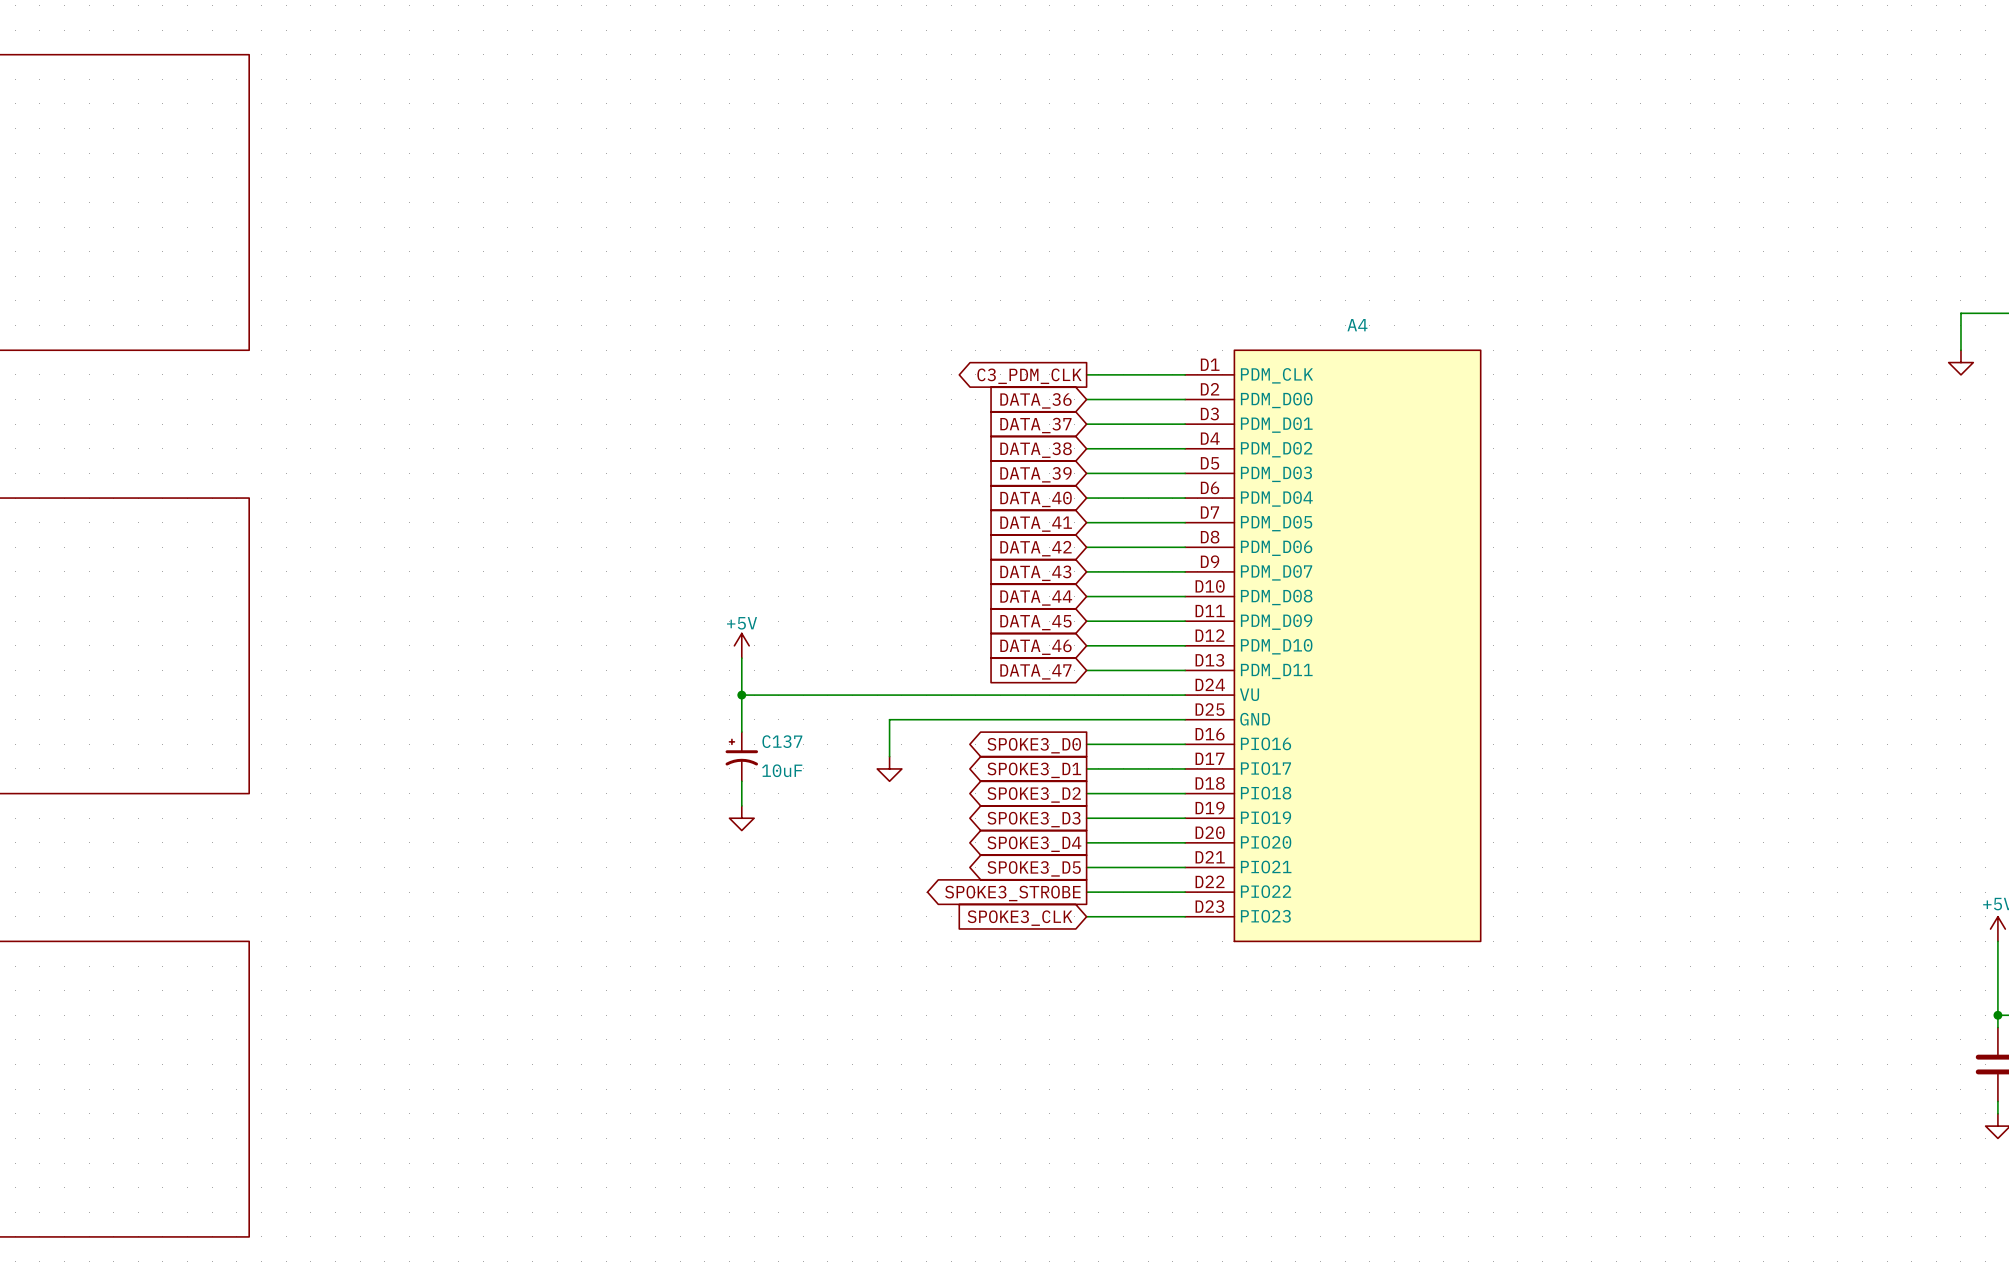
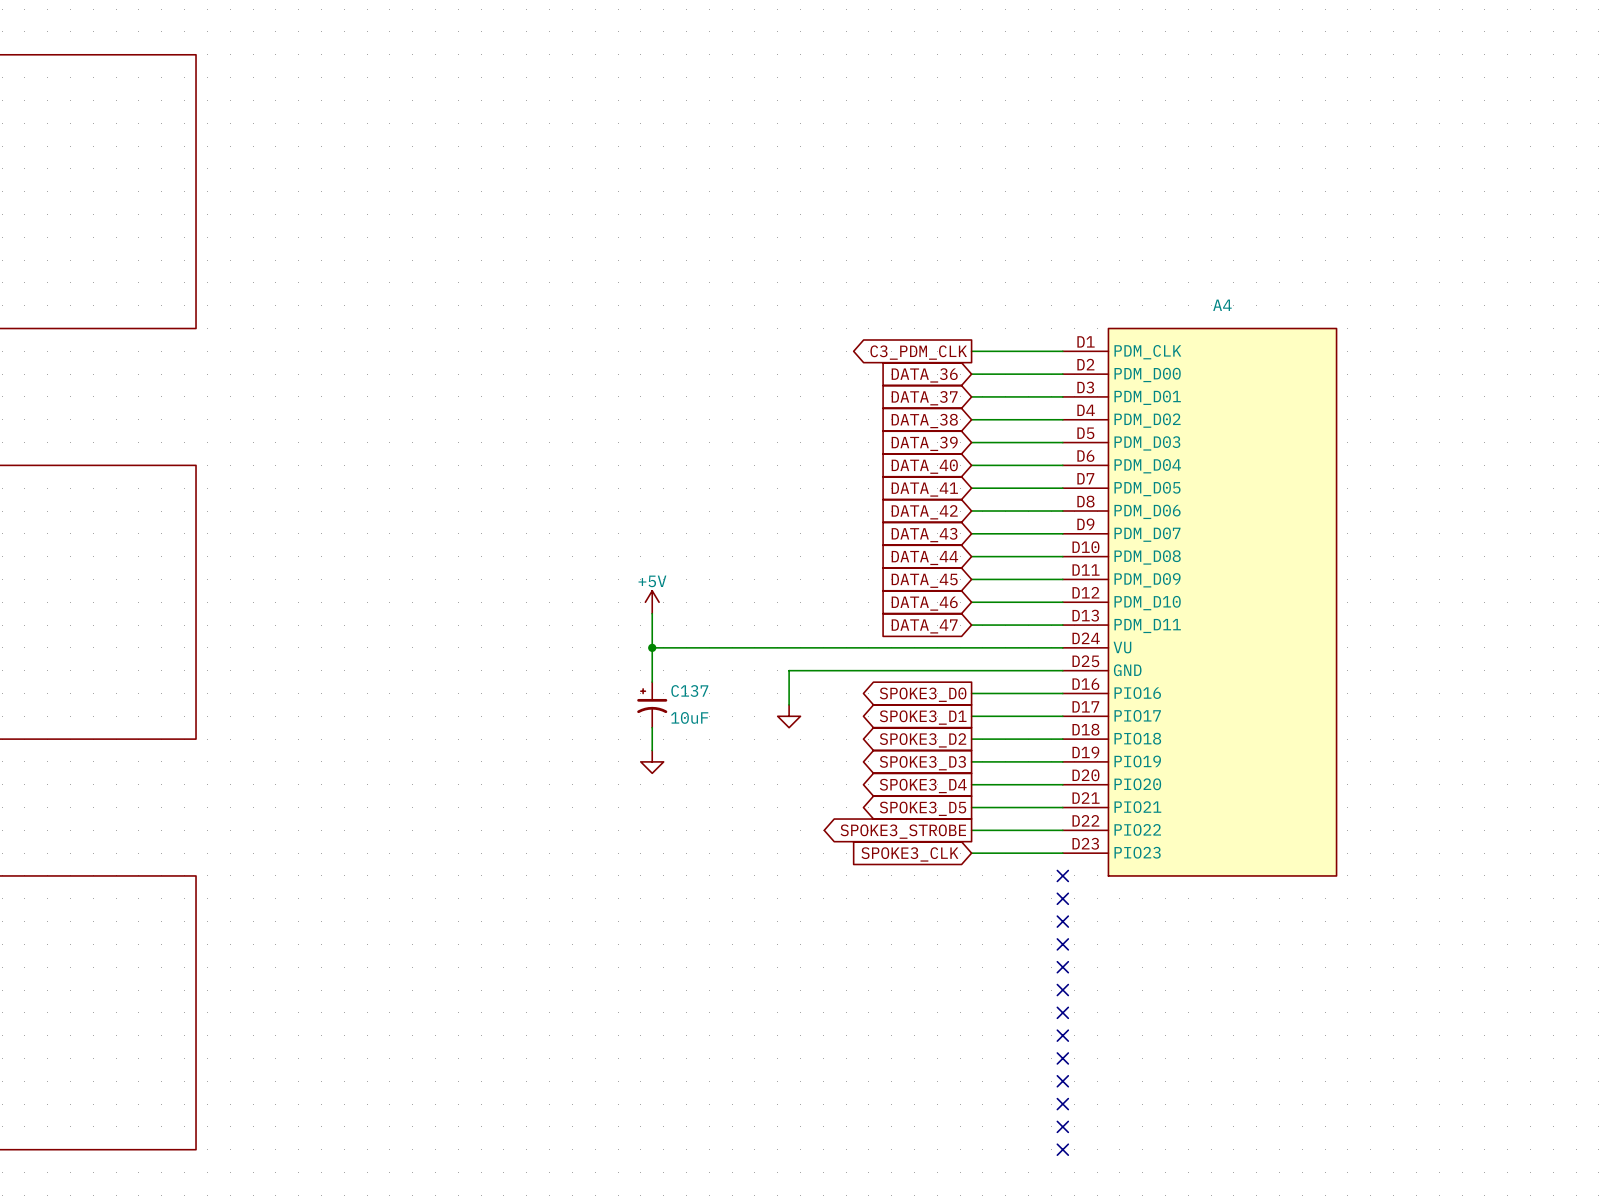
no-connect mark: none -> (1062, 875)
no-connect mark: none -> (1062, 898)
no-connect mark: none -> (1062, 921)
no-connect mark: none -> (1062, 944)
no-connect mark: none -> (1062, 967)
no-connect mark: none -> (1062, 990)
no-connect mark: none -> (1062, 1012)
no-connect mark: none -> (1062, 1035)
no-connect mark: none -> (1062, 1058)
no-connect mark: none -> (1062, 1081)
no-connect mark: none -> (1062, 1104)
no-connect mark: none -> (1062, 1126)
no-connect mark: none -> (1062, 1149)

